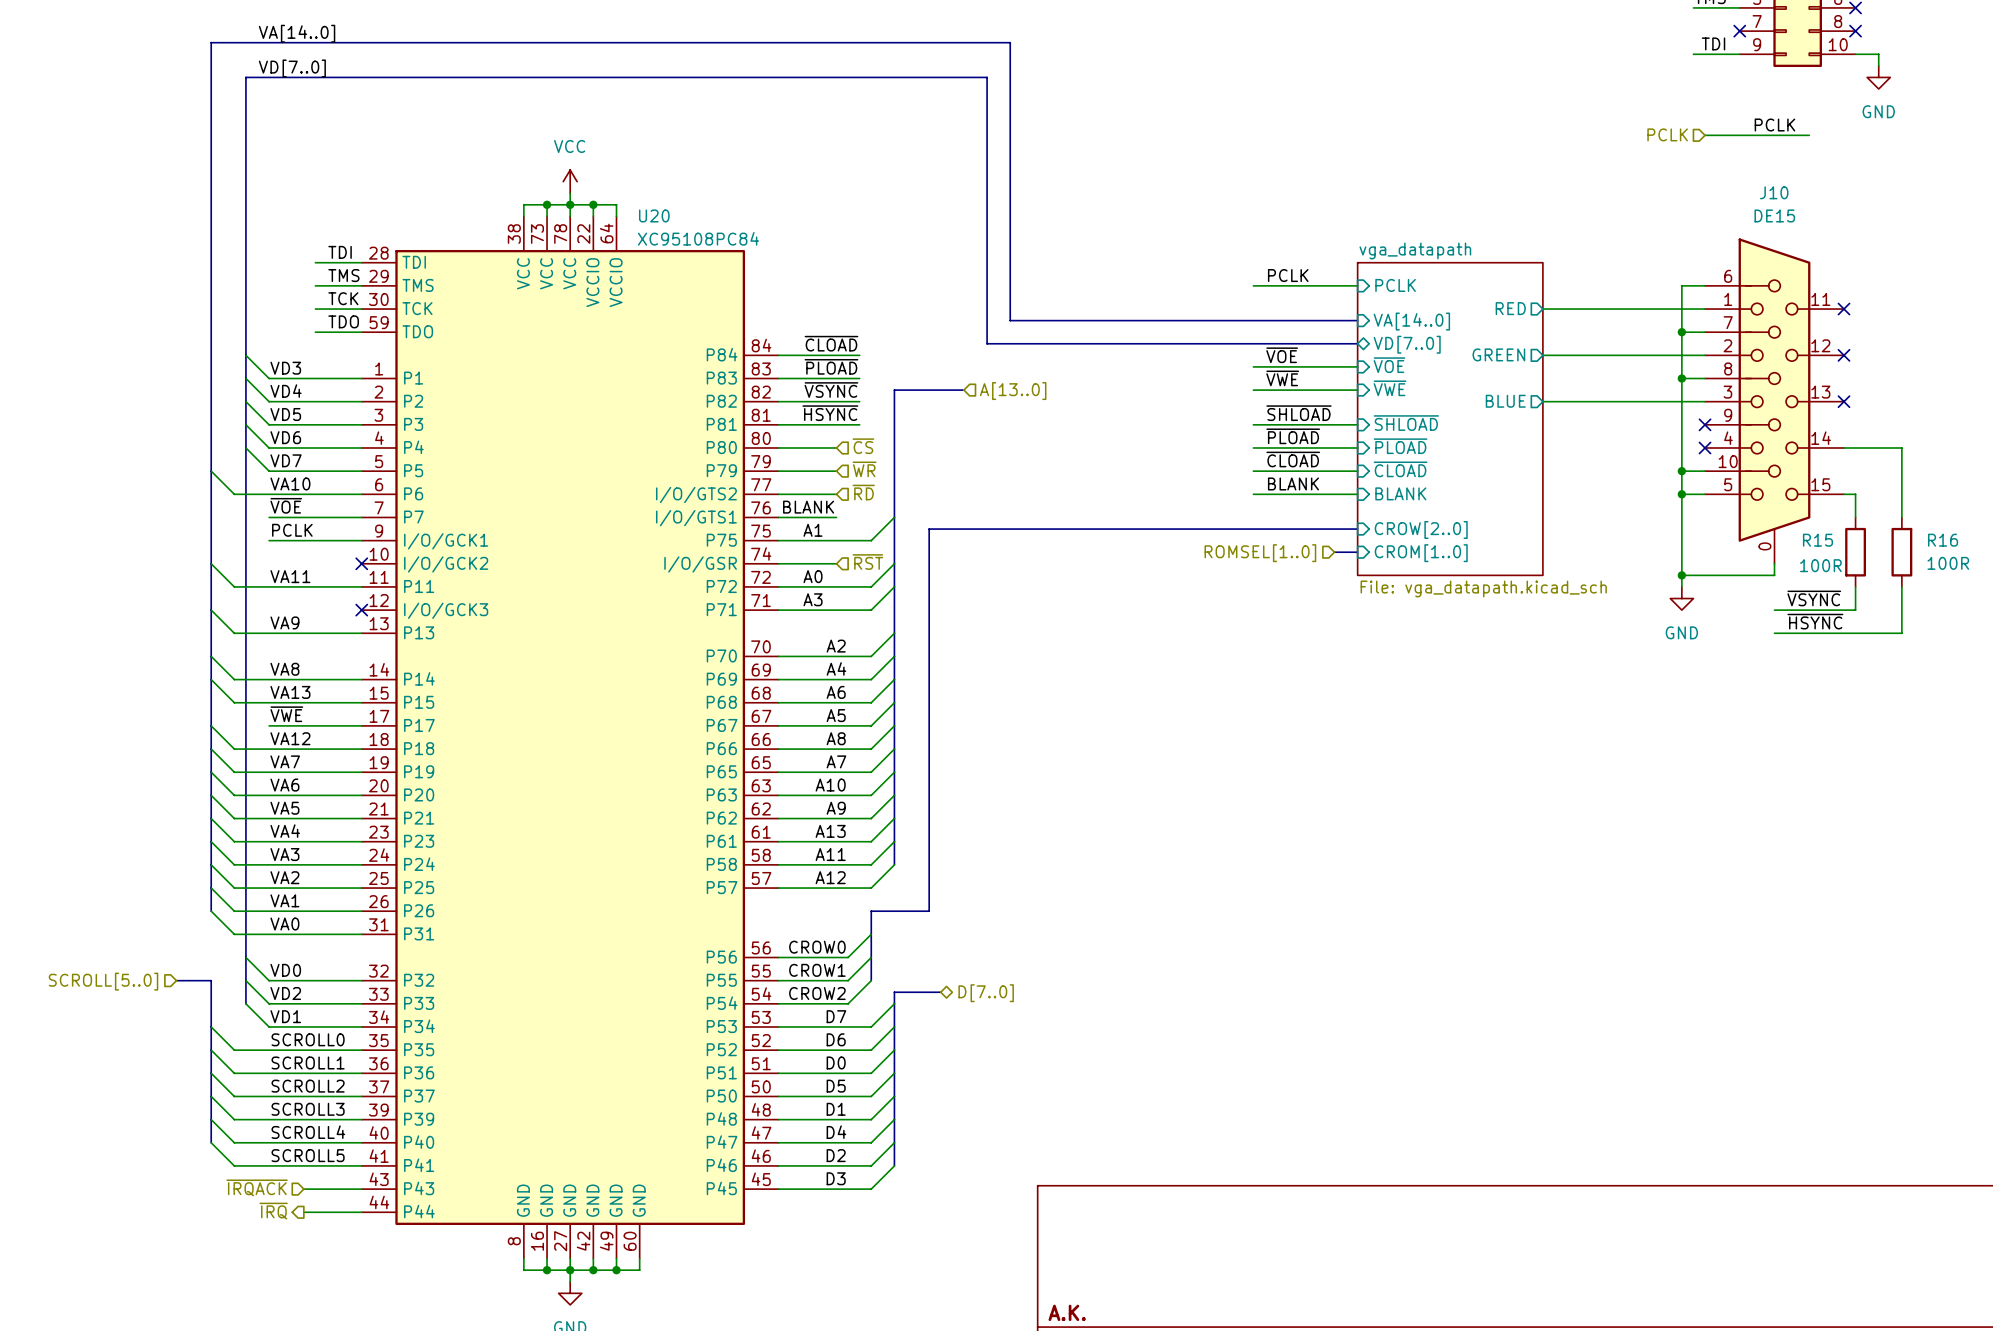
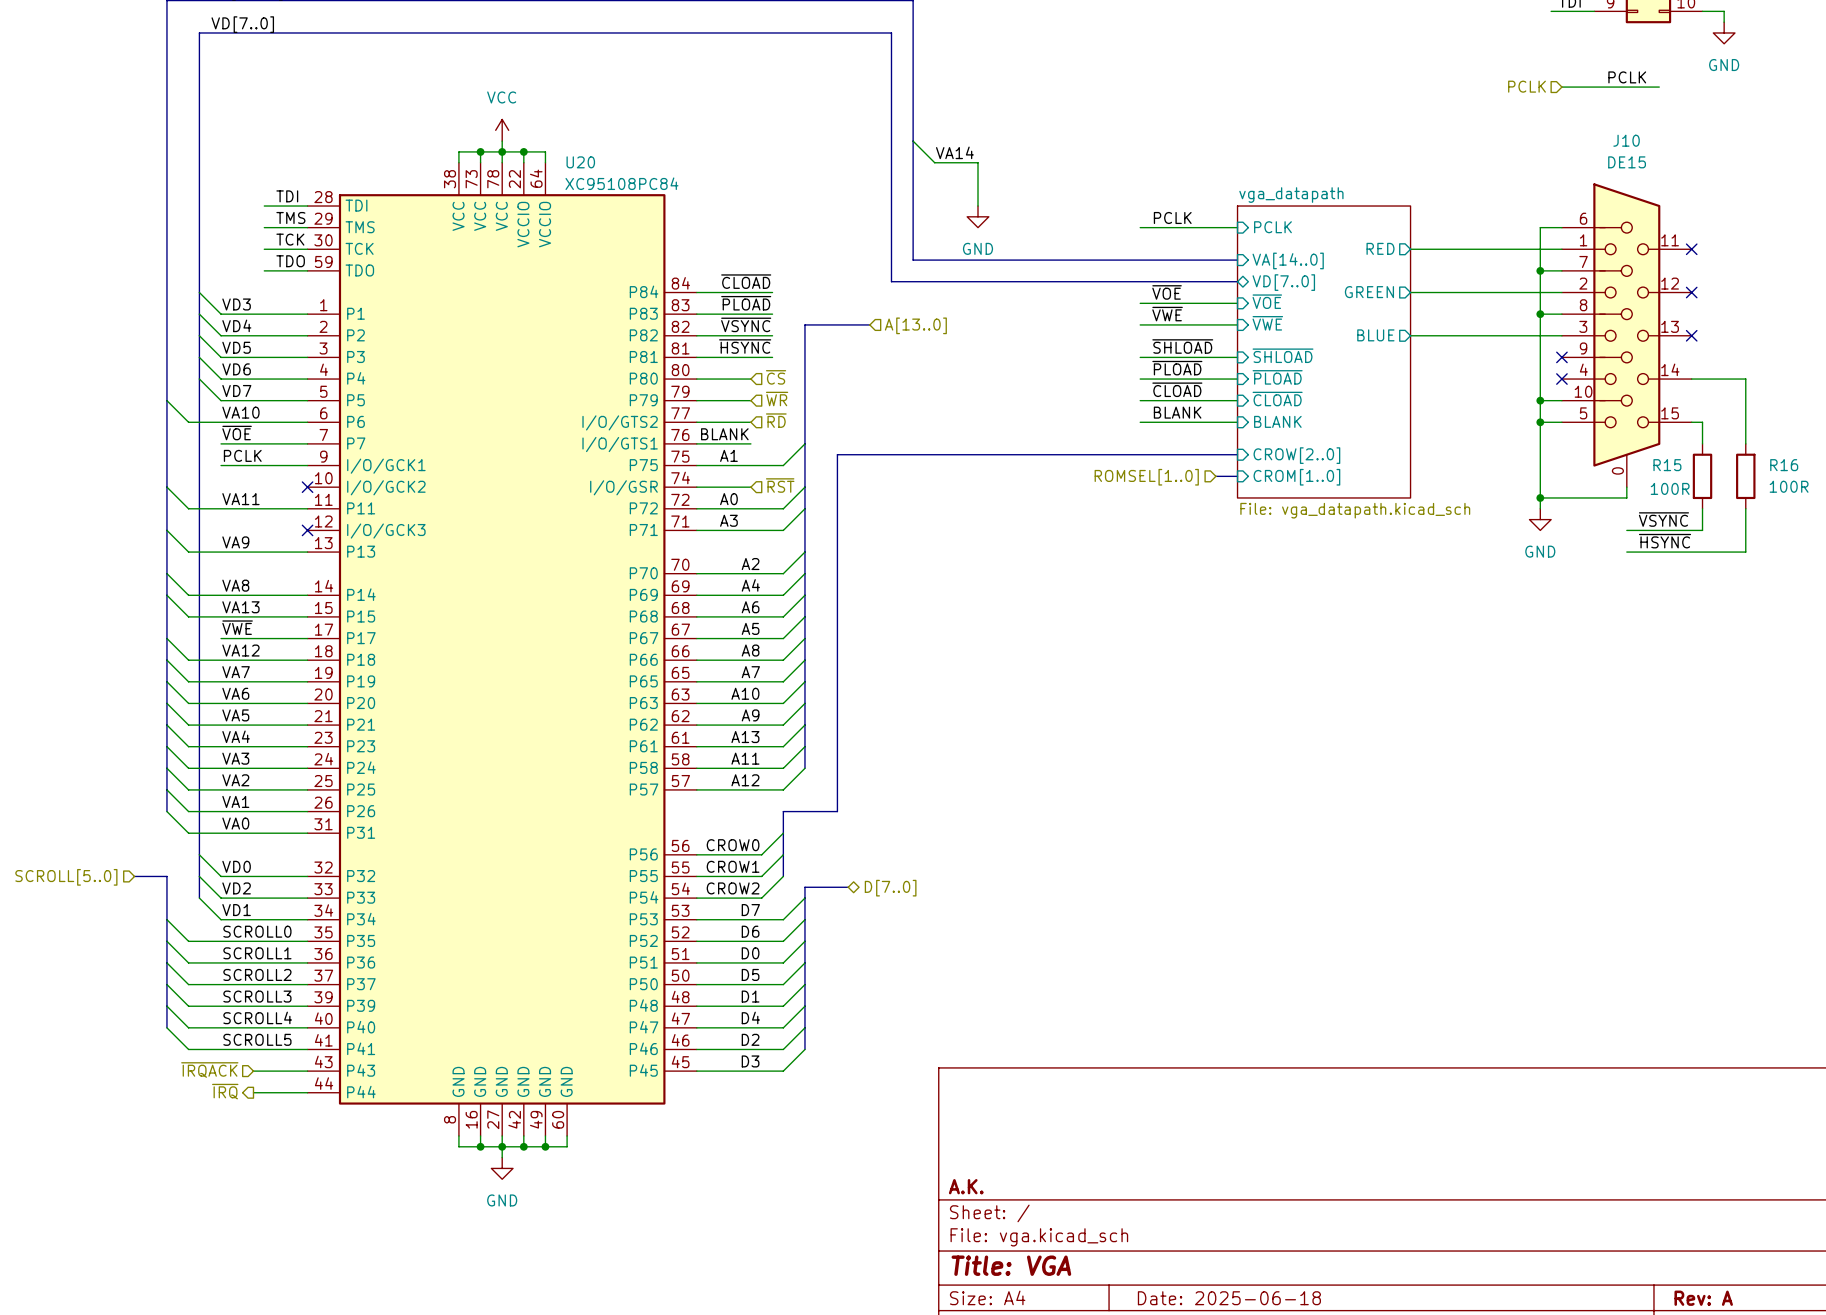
wire: none -> (913, 141) (934, 162) (978, 162) (978, 206)
label: none -> VA14 (954, 152)
power symbol: none -> GND (978, 216)

